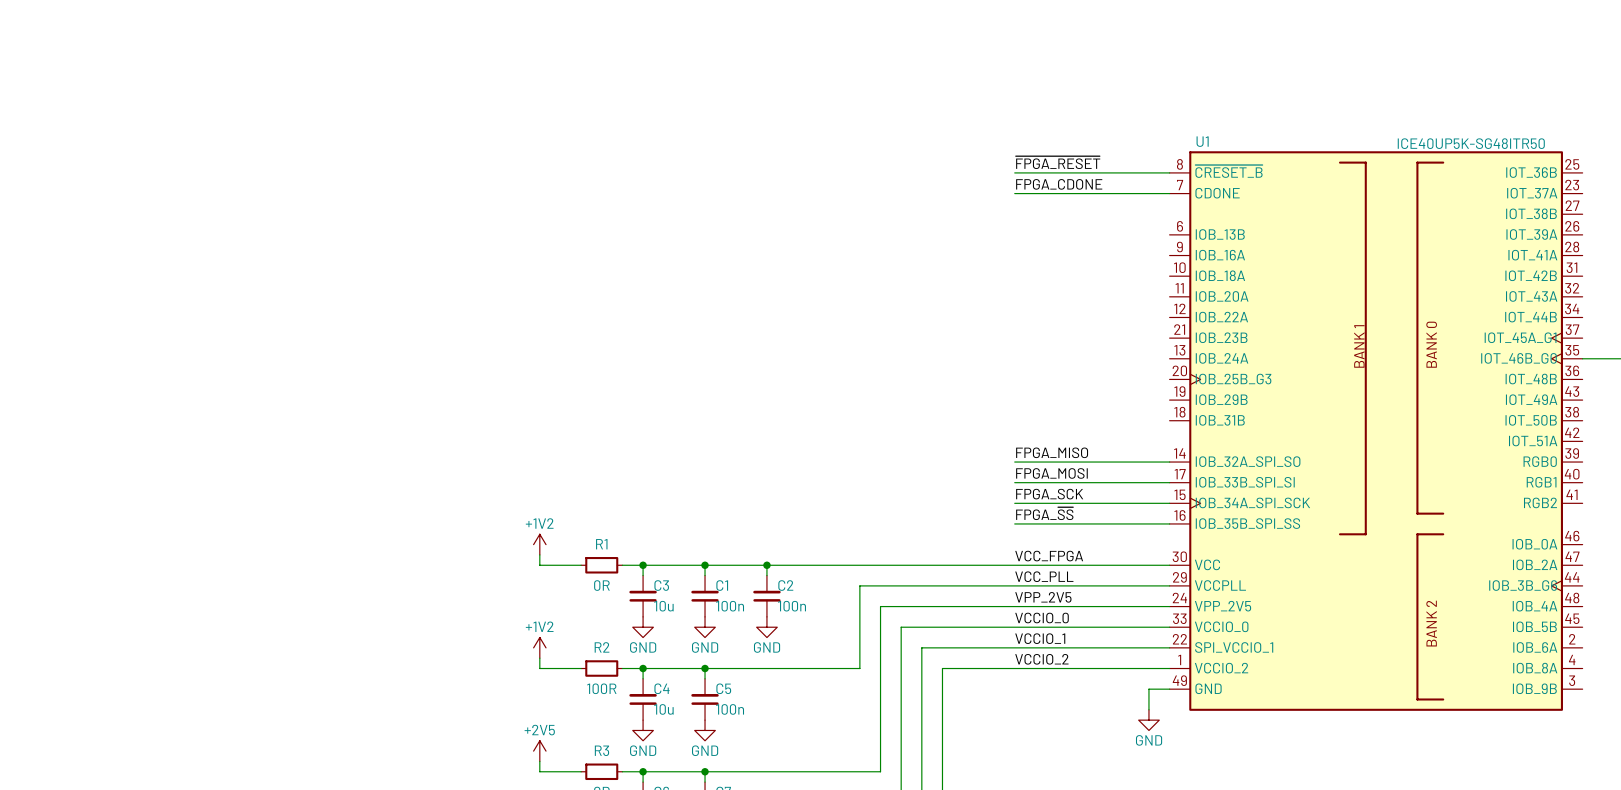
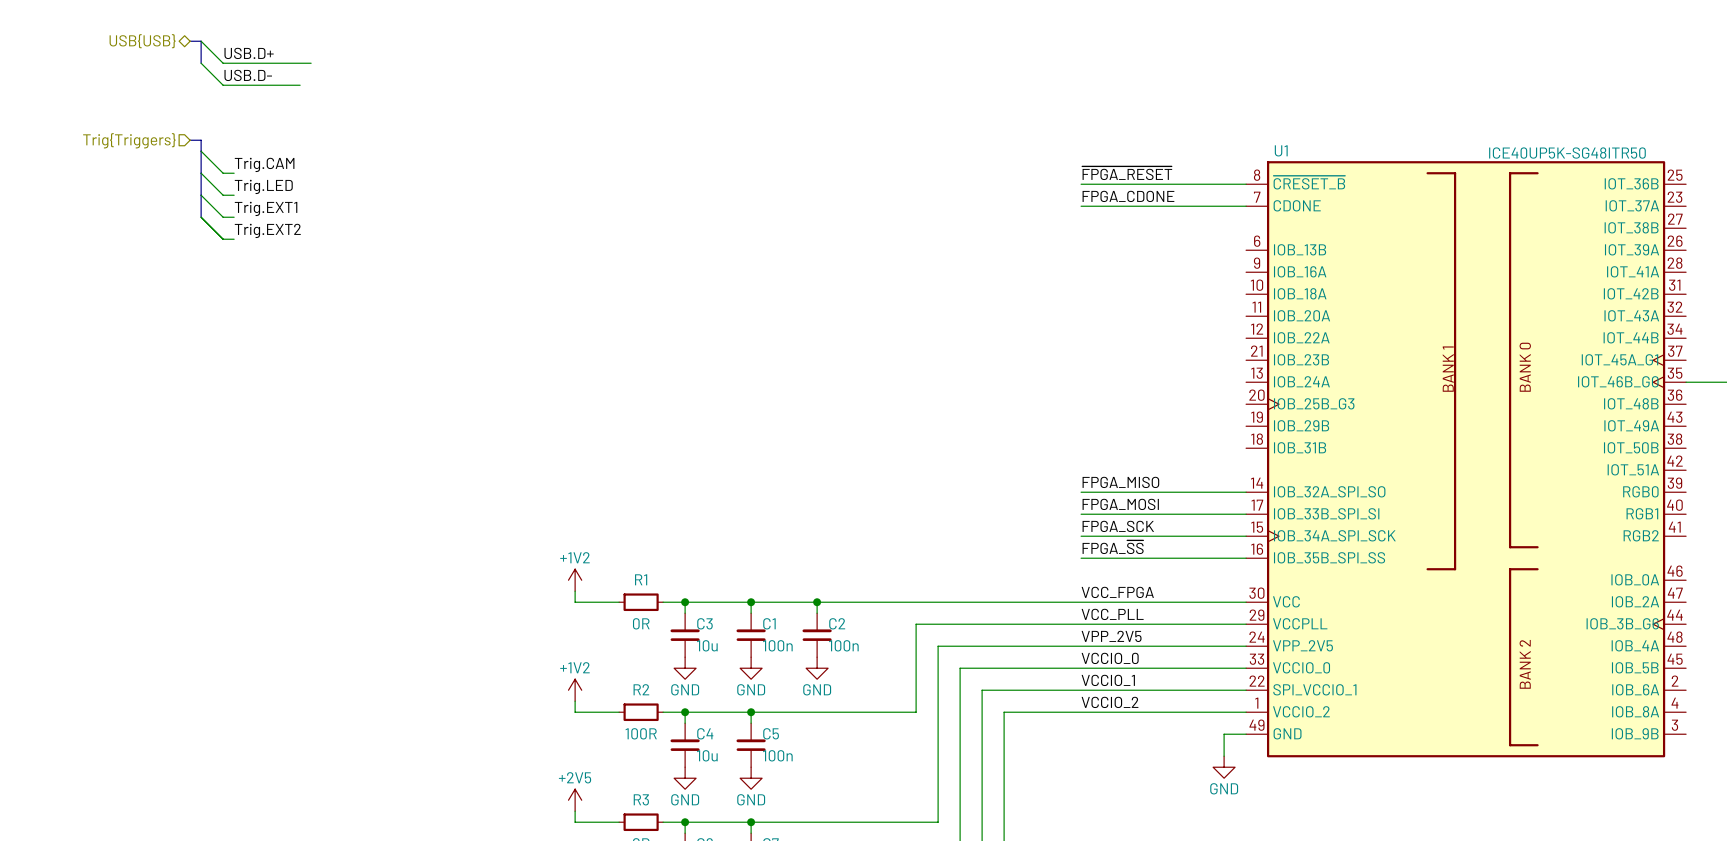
hierarchical label: none -> USB{USB} (142, 41)
bus: none -> (190, 41) (201, 41) (201, 63)
wire: none -> (201, 41) (223, 63) (311, 63)
label: none -> USB.D+ (249, 53)
wire: none -> (201, 63) (223, 85) (300, 85)
label: none -> USB.D- (248, 75)
bus: none -> (190, 140) (201, 140) (201, 217)
hierarchical label: none -> Trig{Triggers} (129, 140)
wire: none -> (201, 151) (223, 173) (234, 173)
label: none -> Trig.CAM (264, 164)
wire: none -> (201, 173) (223, 195) (234, 195)
label: none -> Trig.LED (263, 186)
wire: none -> (201, 195) (223, 217) (234, 217)
label: none -> Trig.EXT1 (266, 208)
wire: none -> (201, 217) (223, 239) (234, 239)
label: none -> Trig.EXT2 (267, 230)

